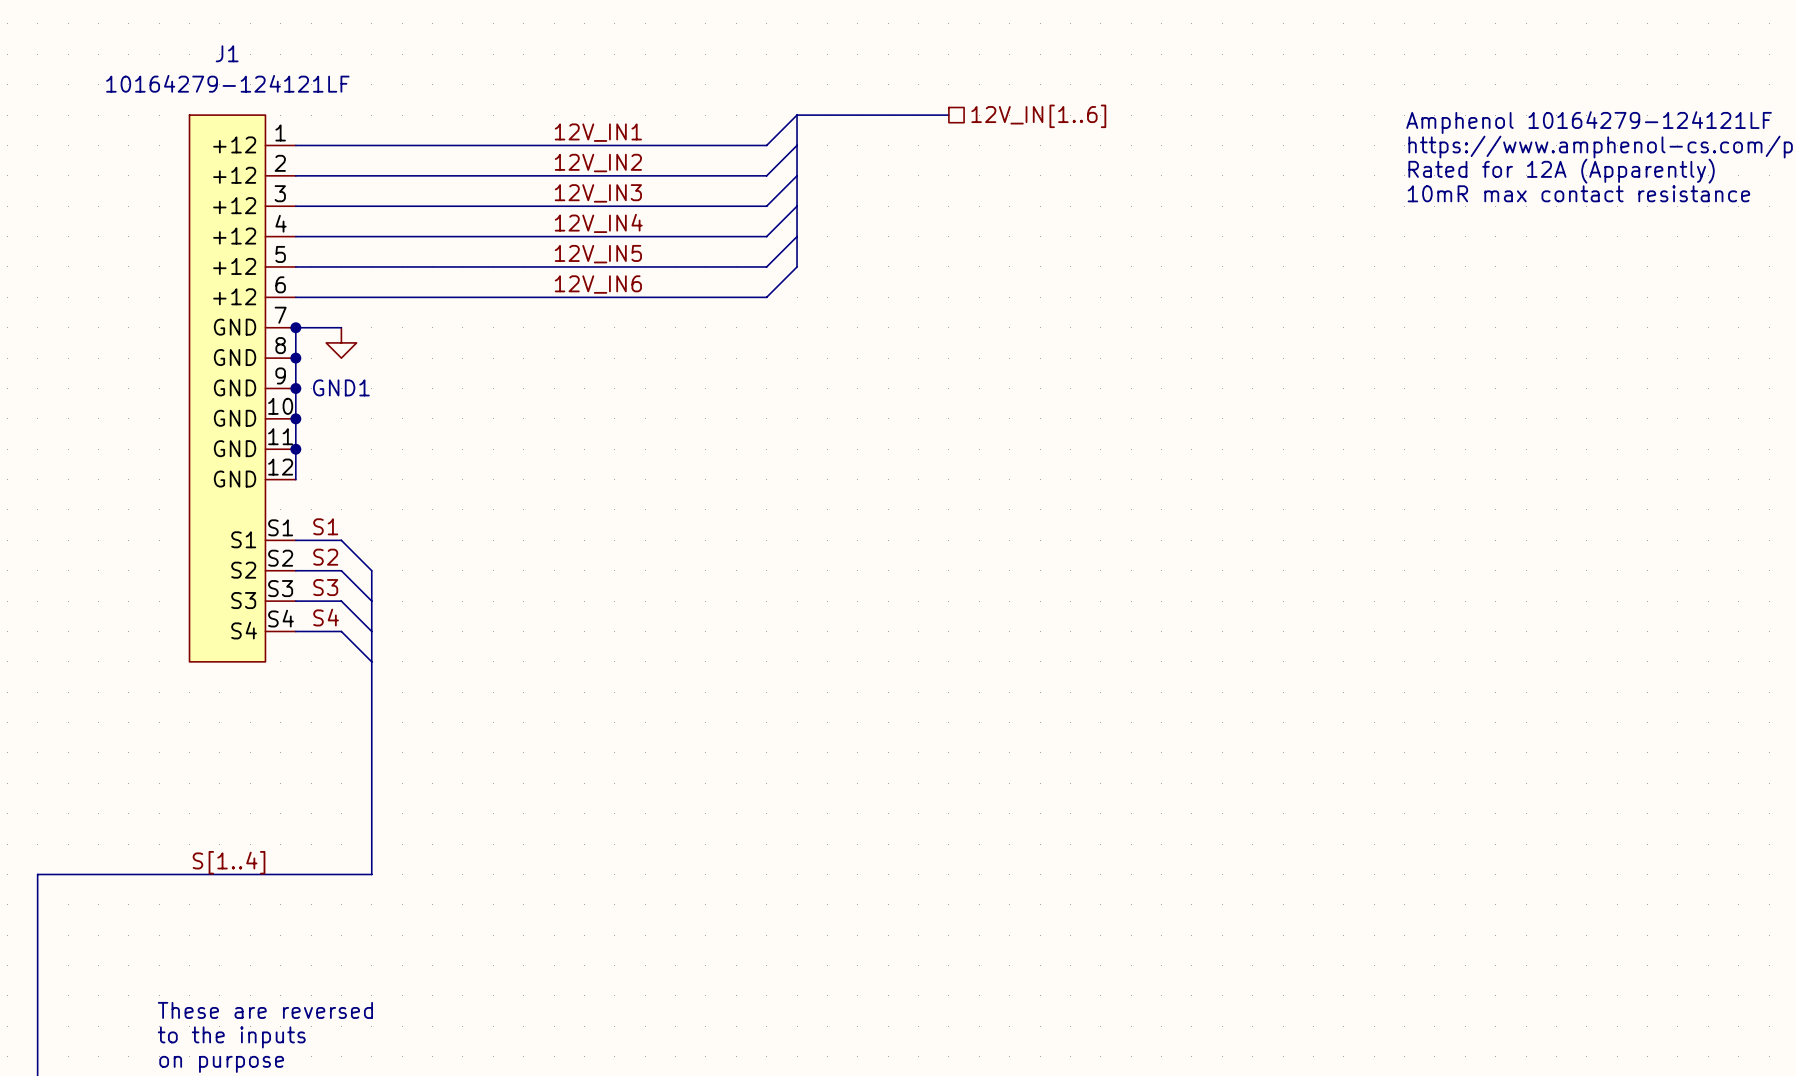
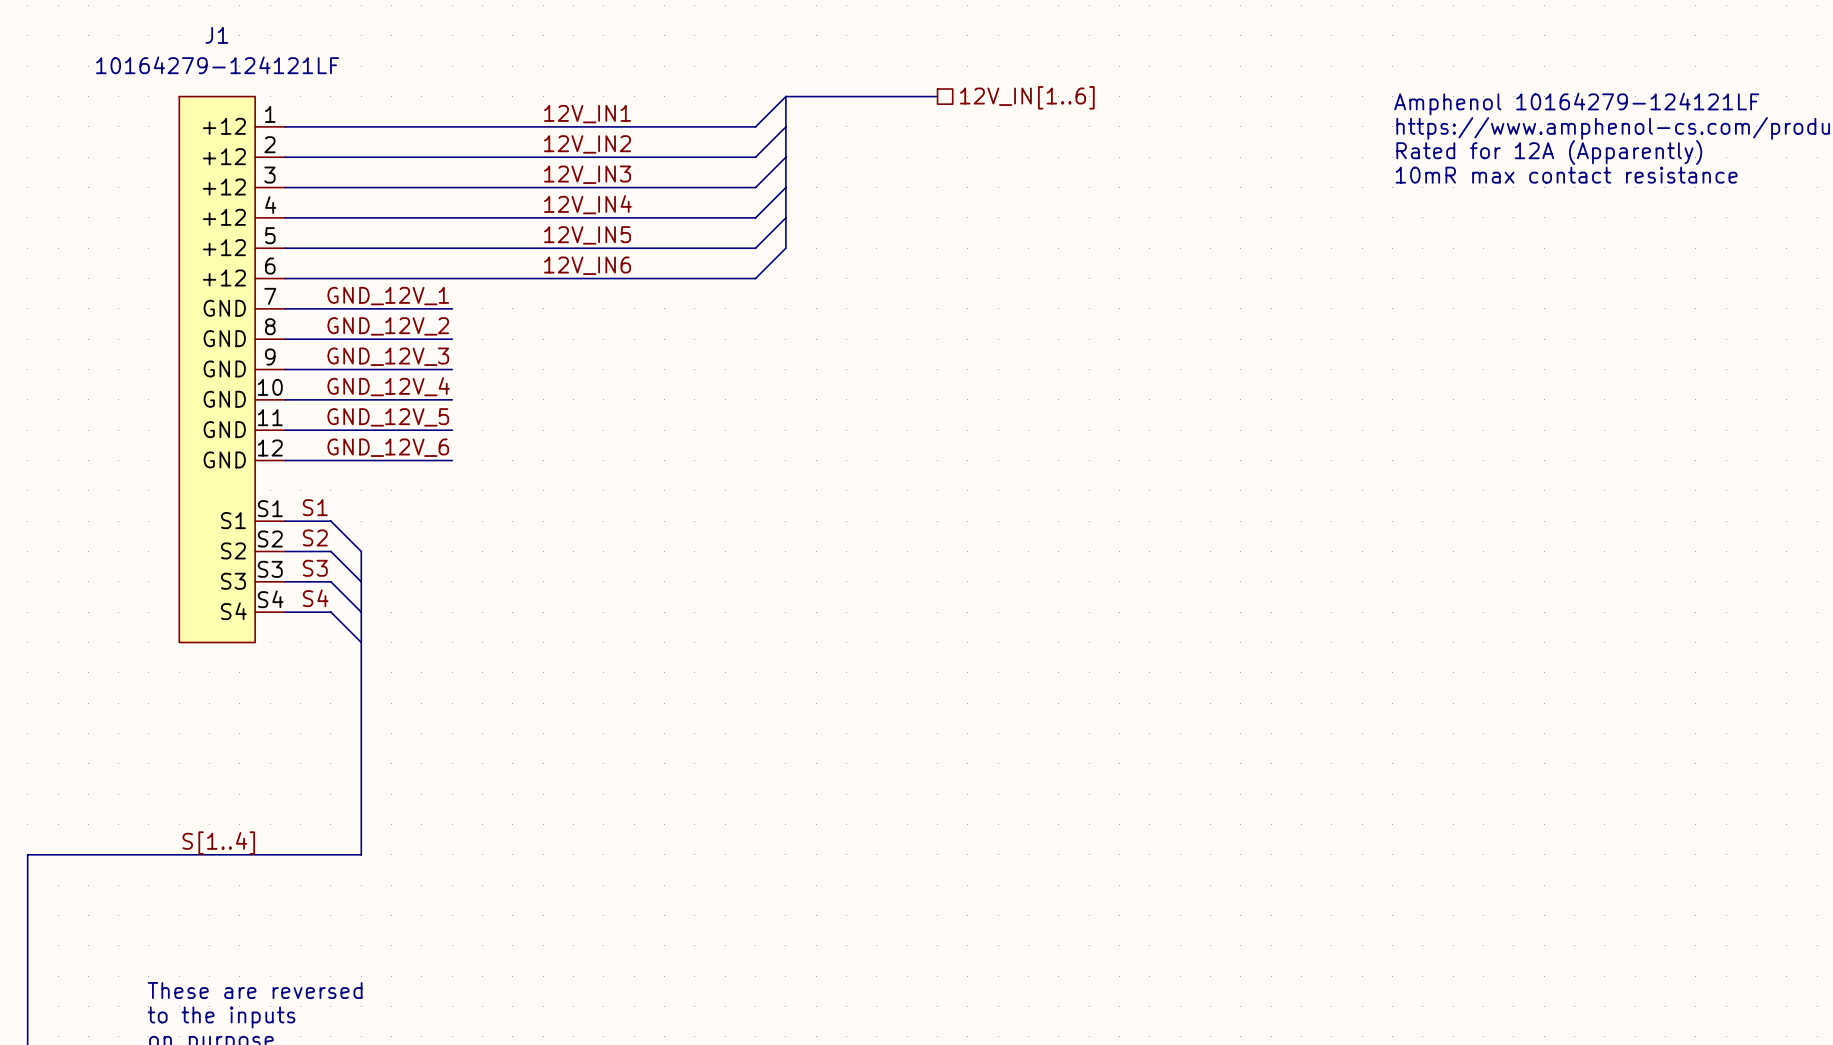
label: none -> GND_12V_1 (388, 296)
wire: (295, 327) (295, 479) -> (452, 460) (285, 460)
junction: (295, 327) -> none
wire: none -> (330, 308) (452, 308)
power symbol: GND1 (341, 342) -> none
label: none -> GND_12V_2 (388, 326)
wire: none -> (285, 339) (452, 339)
junction: (295, 358) -> none
label: none -> GND_12V_3 (388, 356)
wire: none -> (285, 369) (452, 369)
junction: (295, 388) -> none
label: none -> GND_12V_4 (388, 386)
wire: none -> (285, 399) (452, 399)
junction: (295, 418) -> none
label: none -> GND_12V_5 (388, 417)
wire: none -> (285, 430) (452, 430)
junction: (295, 449) -> none
label: none -> GND_12V_6 (388, 447)

